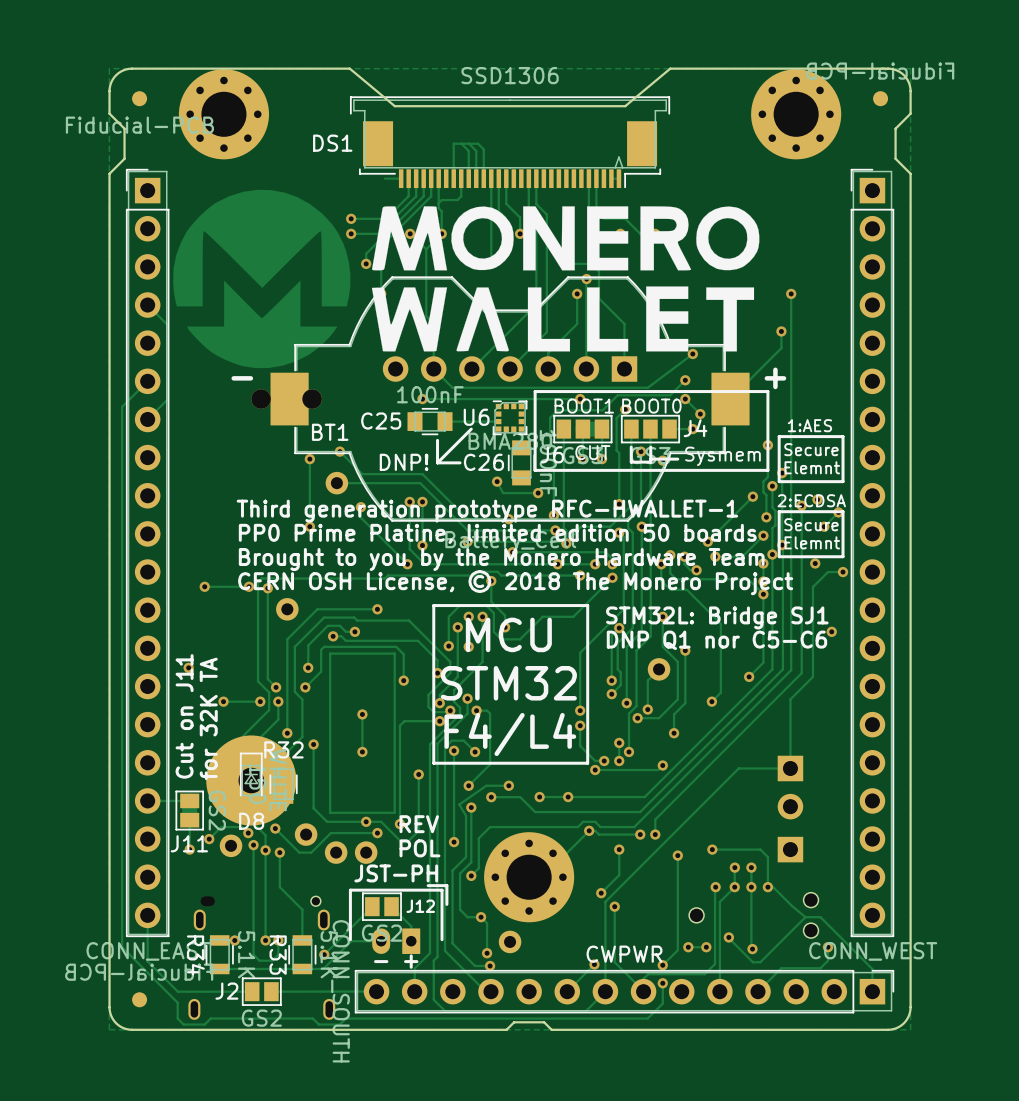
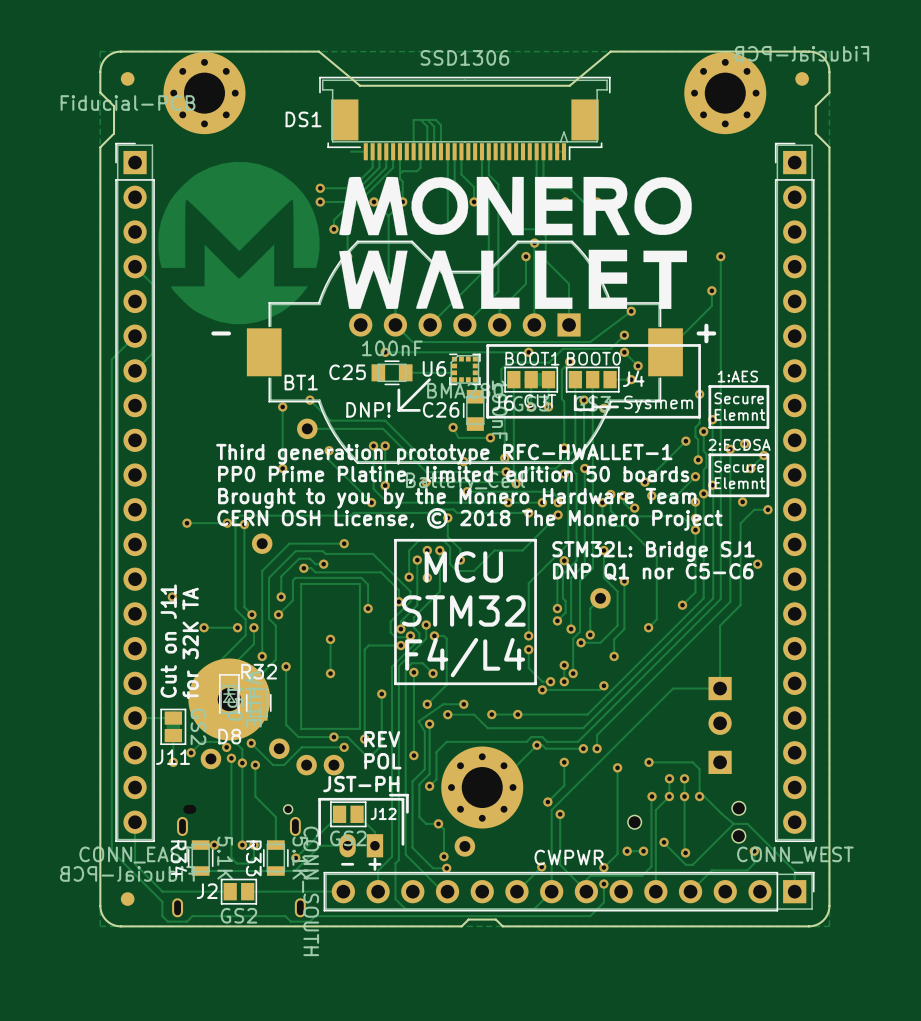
part: (286, 399) -> none

